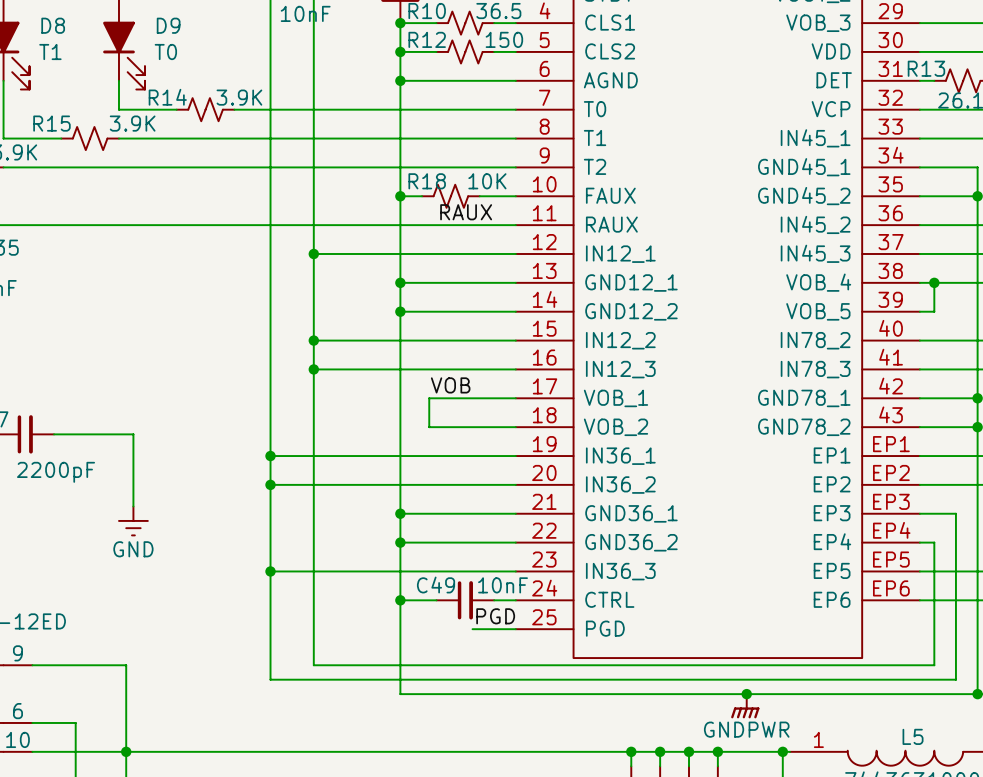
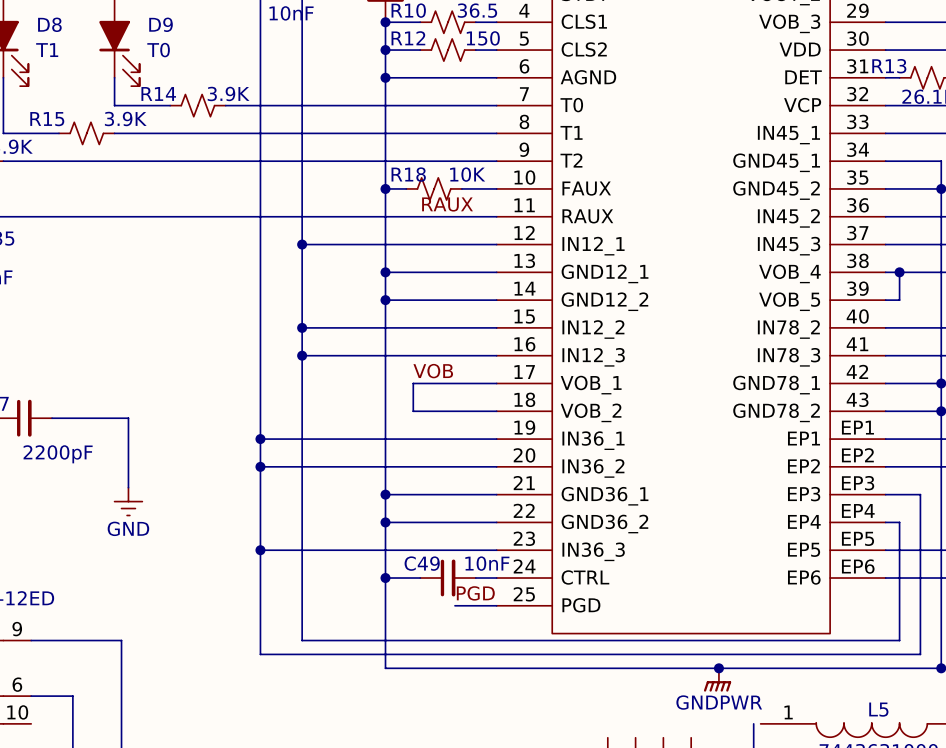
wire: (32, 751) (790, 751) -> none
junction: (126, 751) -> none
wire: (631, 751) (631, 766) -> none
junction: (631, 751) -> none
wire: (660, 751) (660, 766) -> none
junction: (660, 751) -> none
wire: (689, 751) (689, 766) -> none
junction: (689, 751) -> none
wire: (717, 751) (717, 766) -> none
junction: (717, 751) -> none
junction: (782, 751) -> none

